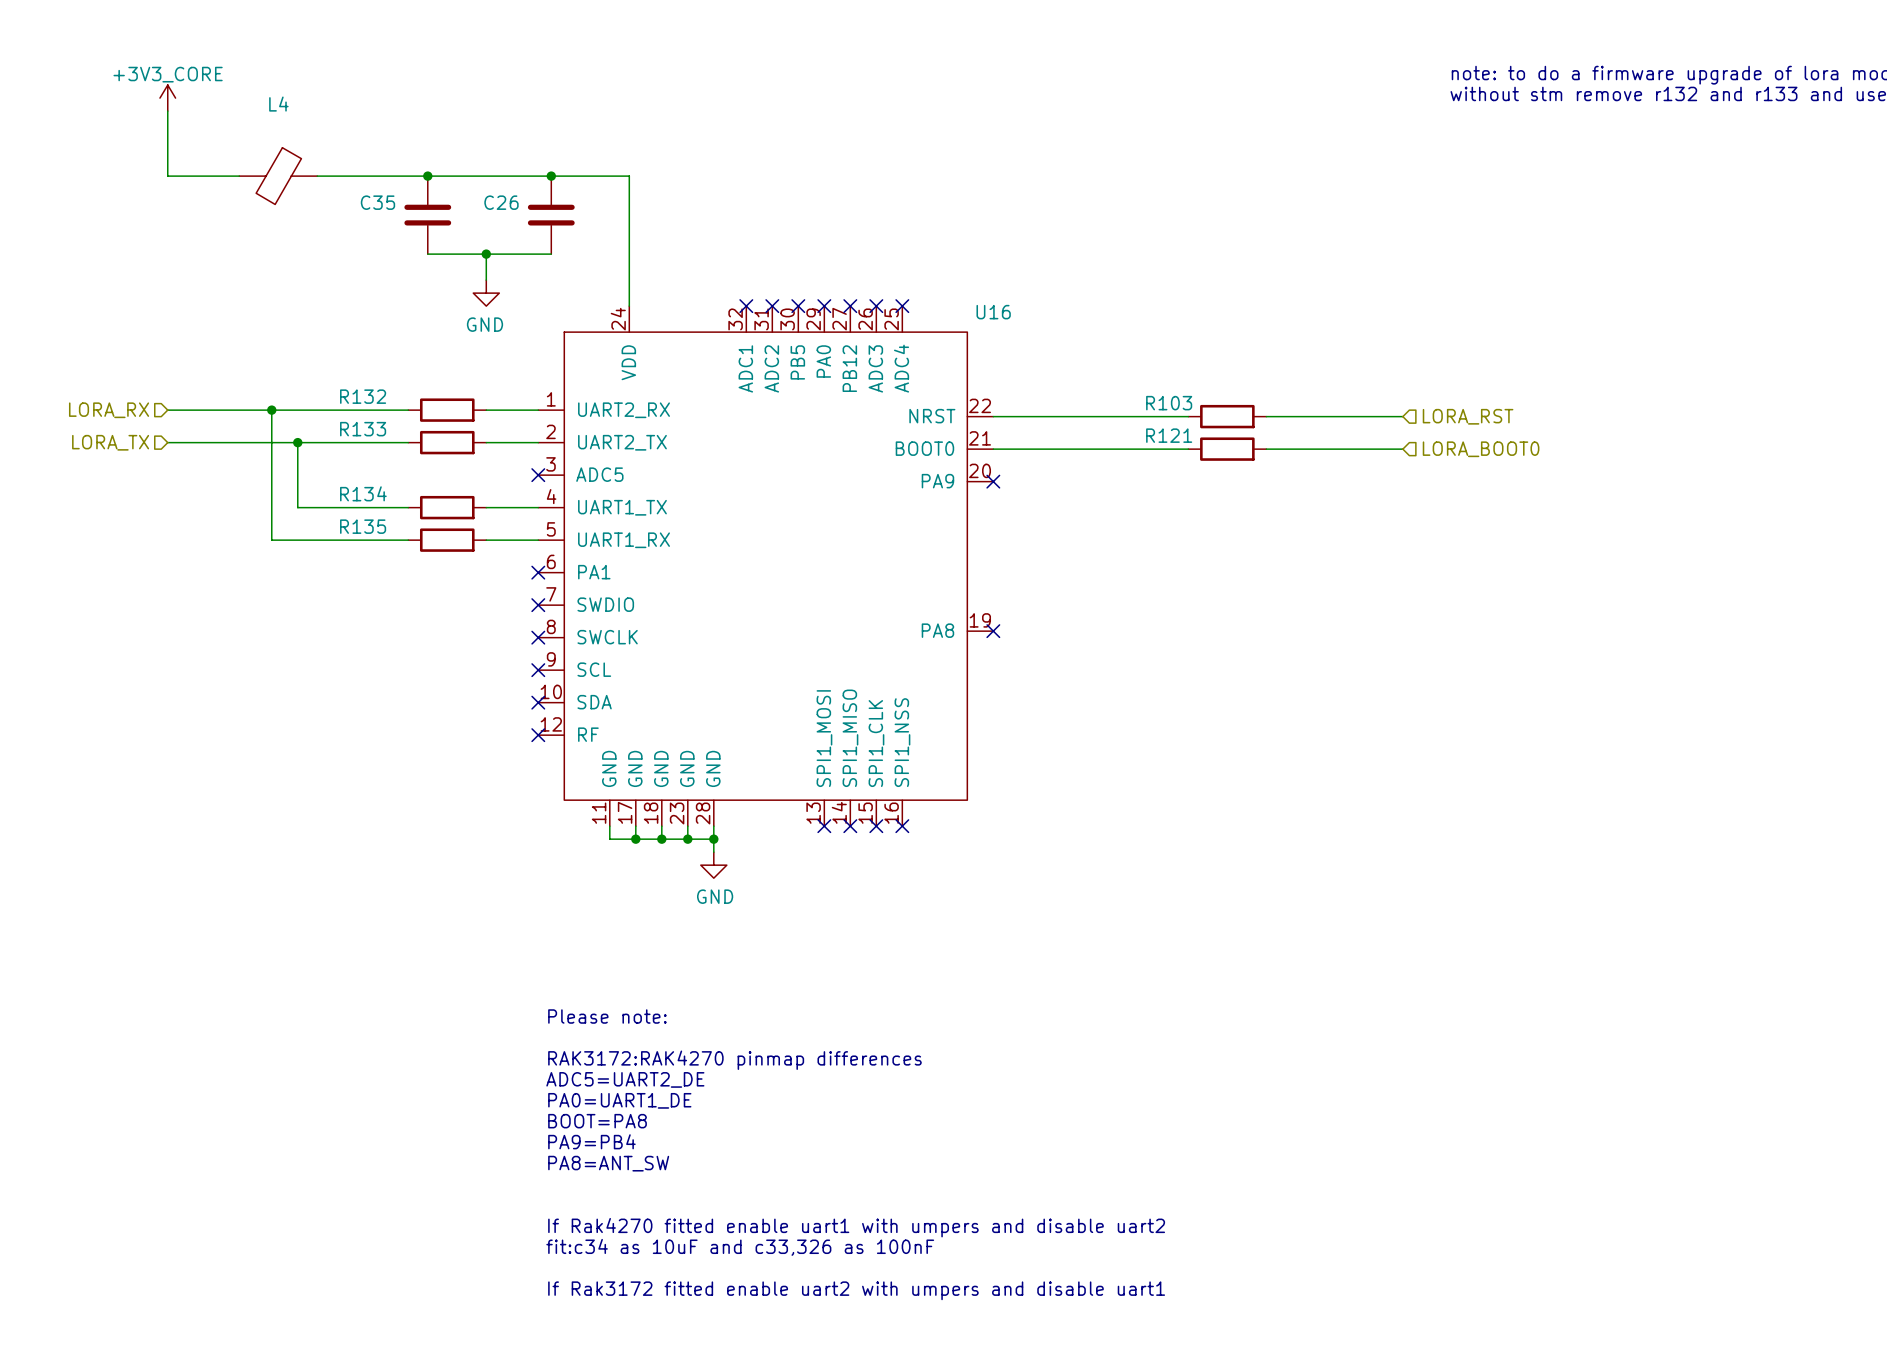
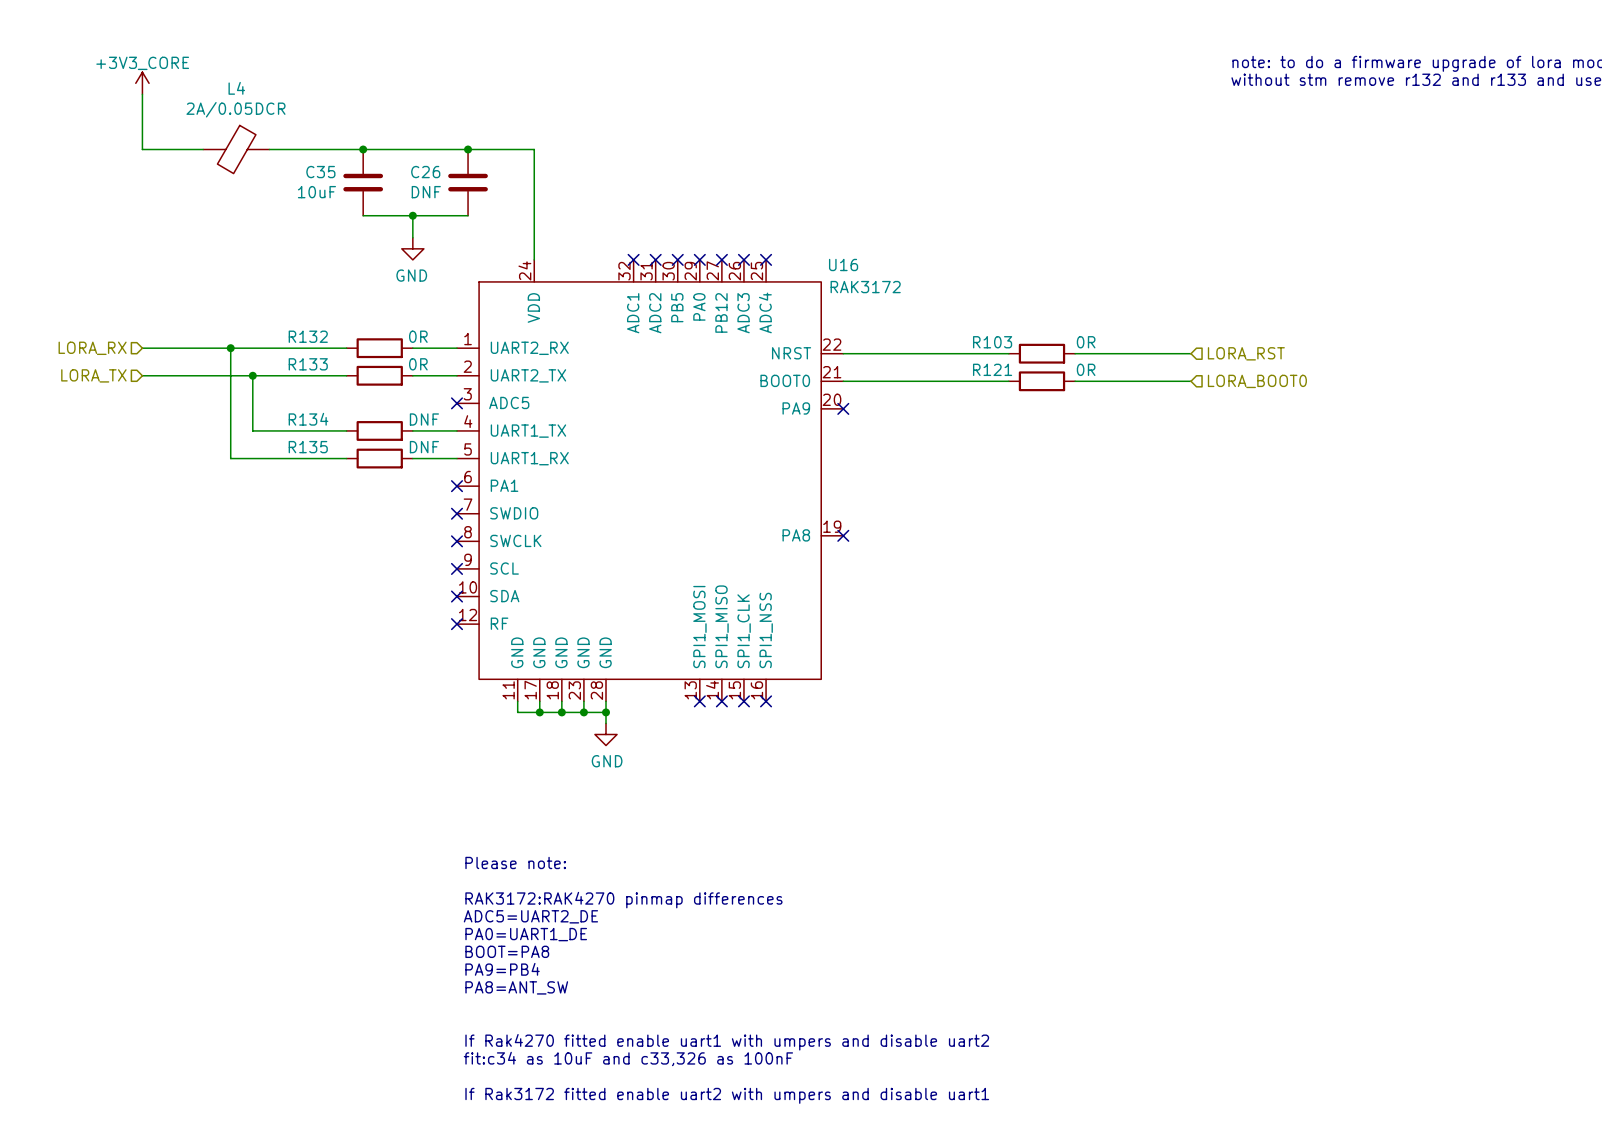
L4 value: none -> 2A/0.05DCR (235, 109)
C35 value: none -> 10uF (316, 192)
C26 value: none -> DNF (426, 192)
U16 value: none -> RAK3172 (865, 287)
R132 value: none -> 0R (418, 336)
R103 value: none -> 0R (1086, 342)
R133 value: none -> 0R (418, 364)
R121 value: none -> 0R (1086, 369)
R134 value: none -> DNF (424, 419)
R135 value: none -> DNF (424, 447)

